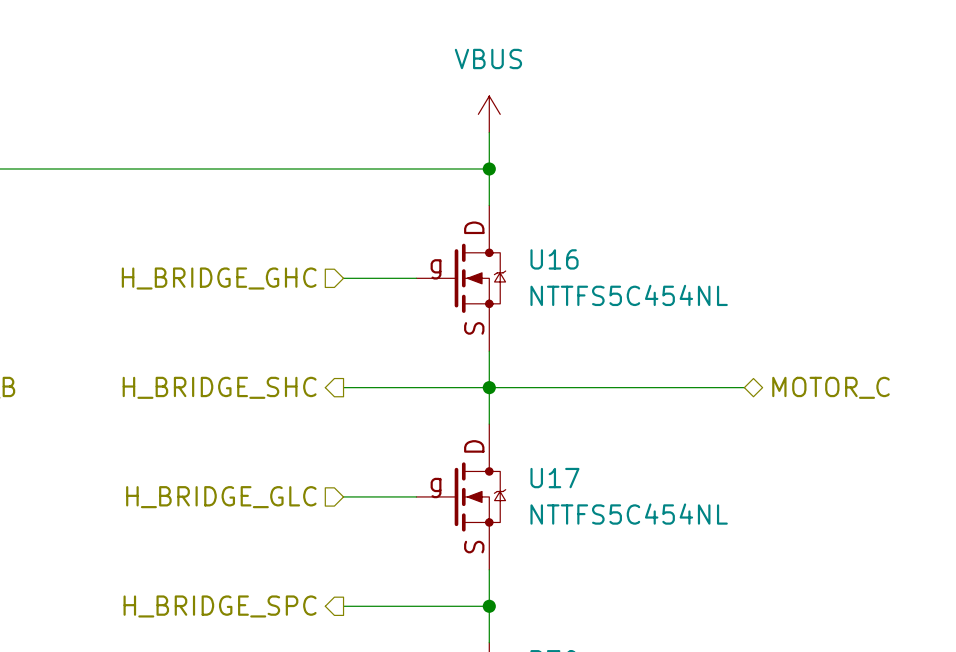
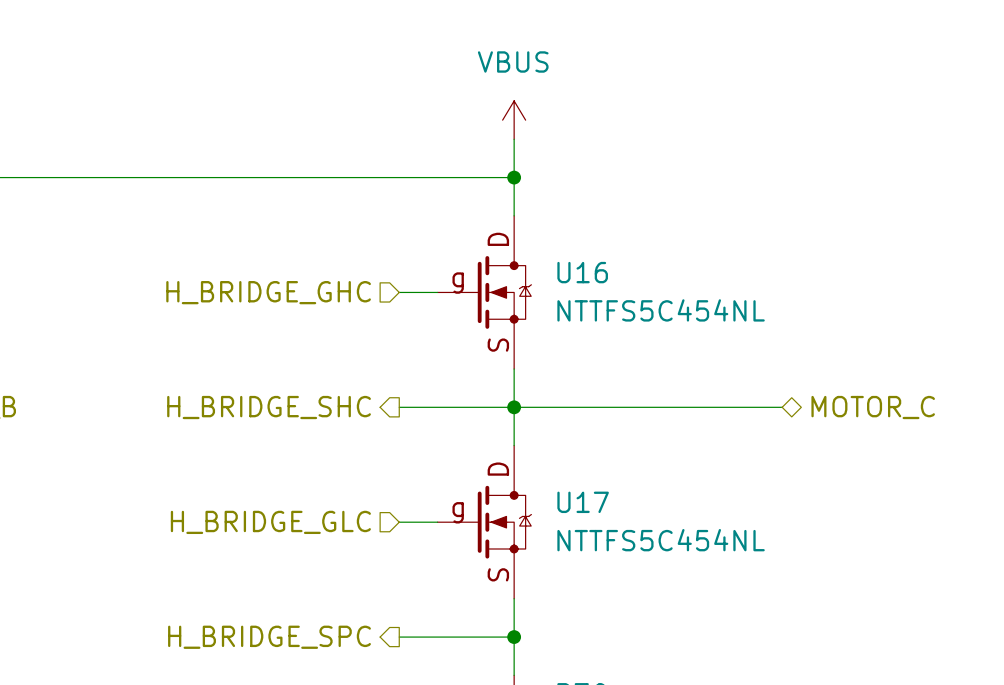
hierarchical label position: H_BRIDGE_GHC (219, 278) -> H_BRIDGE_GHC (268, 292)
wire: (343, 278) (379, 278) -> none
hierarchical label position: H_BRIDGE_SHC (219, 387) -> H_BRIDGE_SHC (269, 407)
wire: (343, 387) (379, 387) -> none
wire: (343, 496) (379, 496) -> none
hierarchical label position: H_BRIDGE_GLC (221, 497) -> H_BRIDGE_GLC (270, 522)
hierarchical label position: H_BRIDGE_SPC (220, 606) -> H_BRIDGE_SPC (269, 637)
wire: (343, 606) (379, 606) -> none

